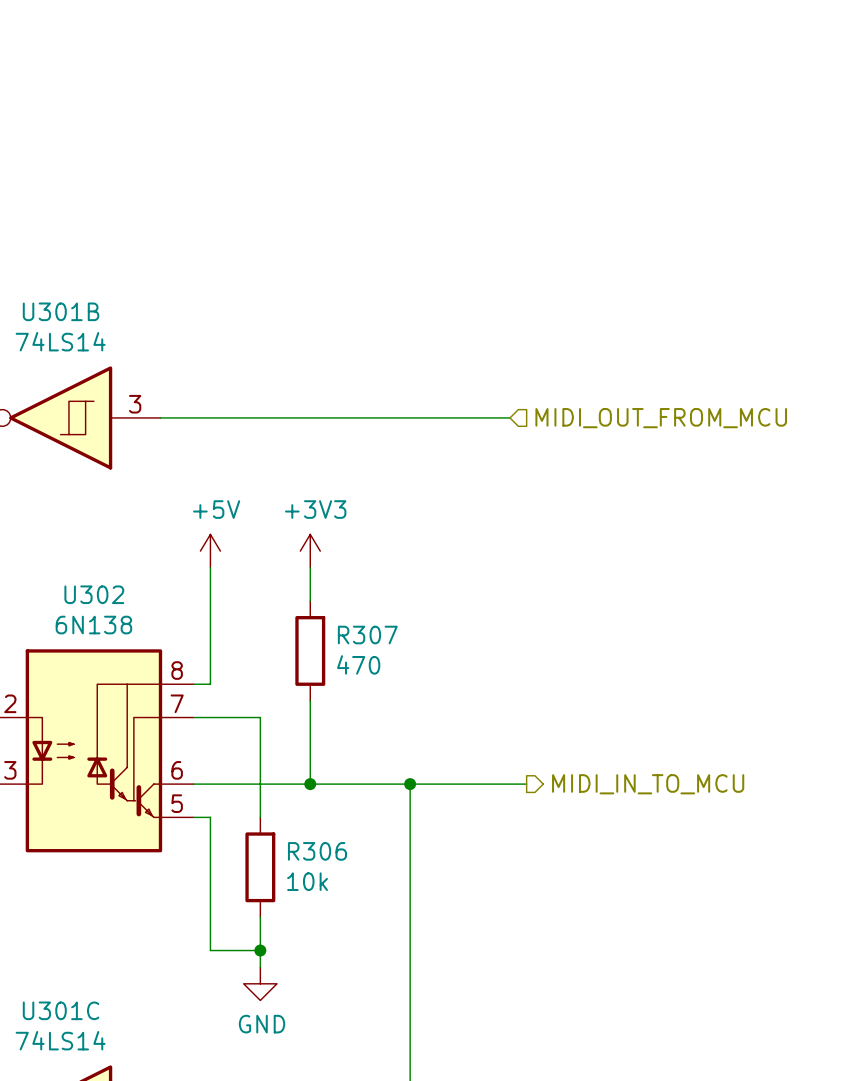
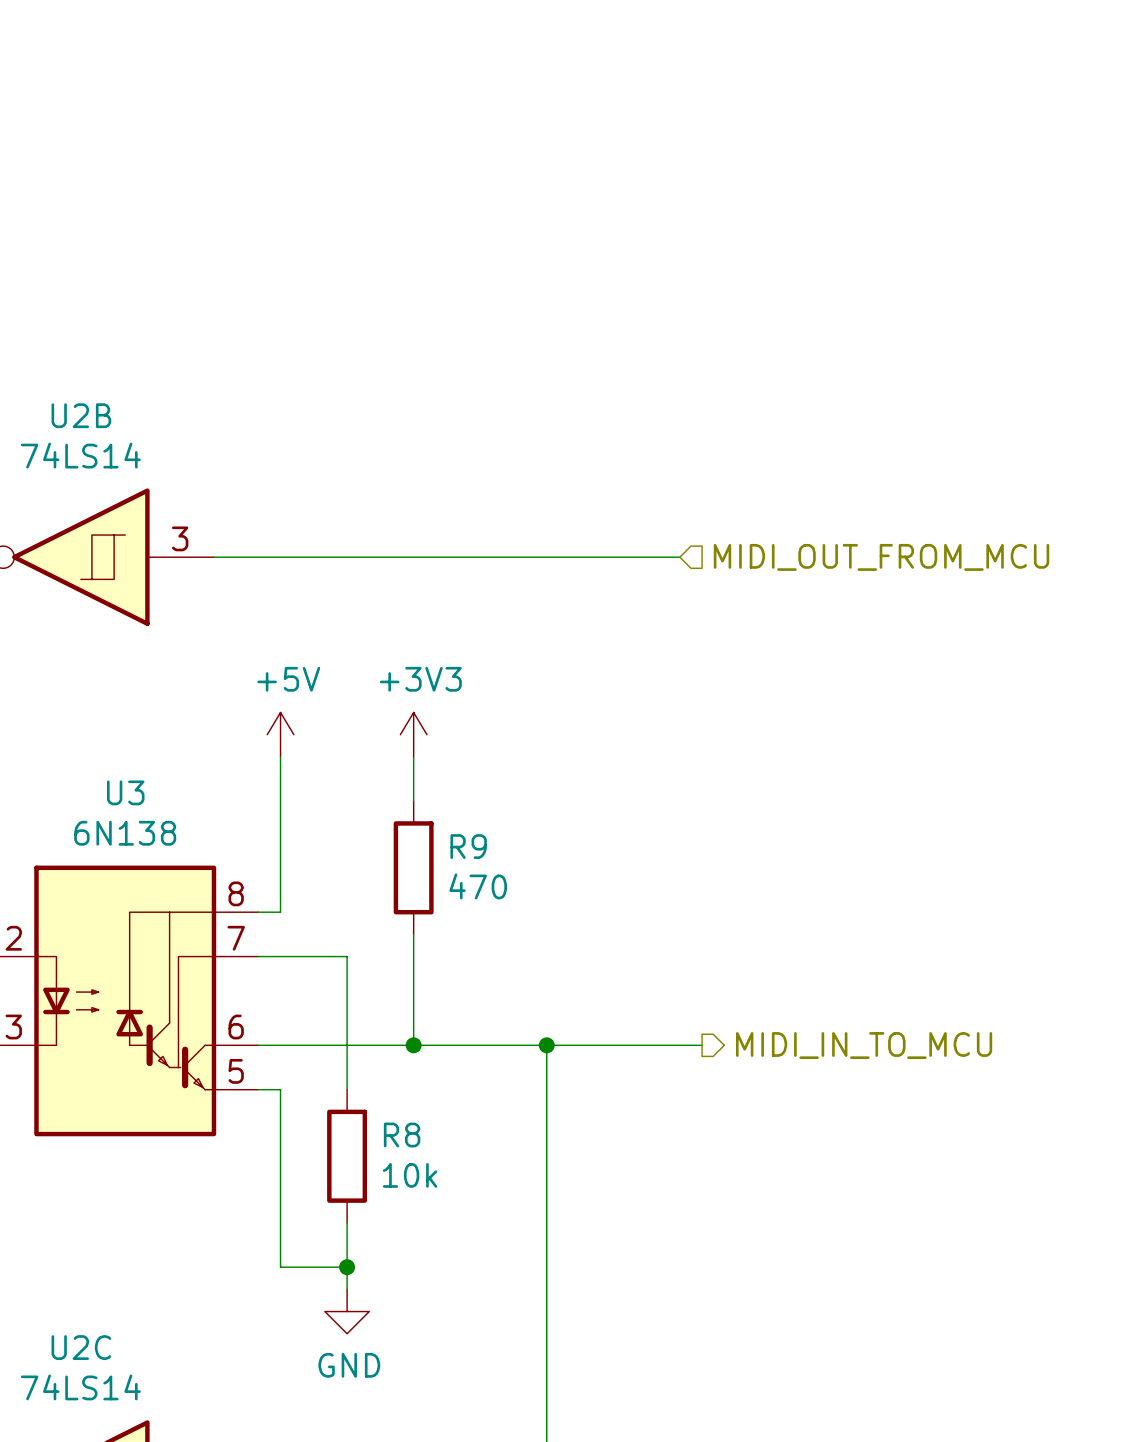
U301B name: U301B (61, 311) -> U2B (81, 415)
U302 name: U302 (94, 594) -> U3 (125, 792)
R307 name: R307 (367, 635) -> R9 (468, 846)
R306 name: R306 (317, 851) -> R8 (402, 1135)
U301C name: U301C (61, 1010) -> U2C (81, 1347)

